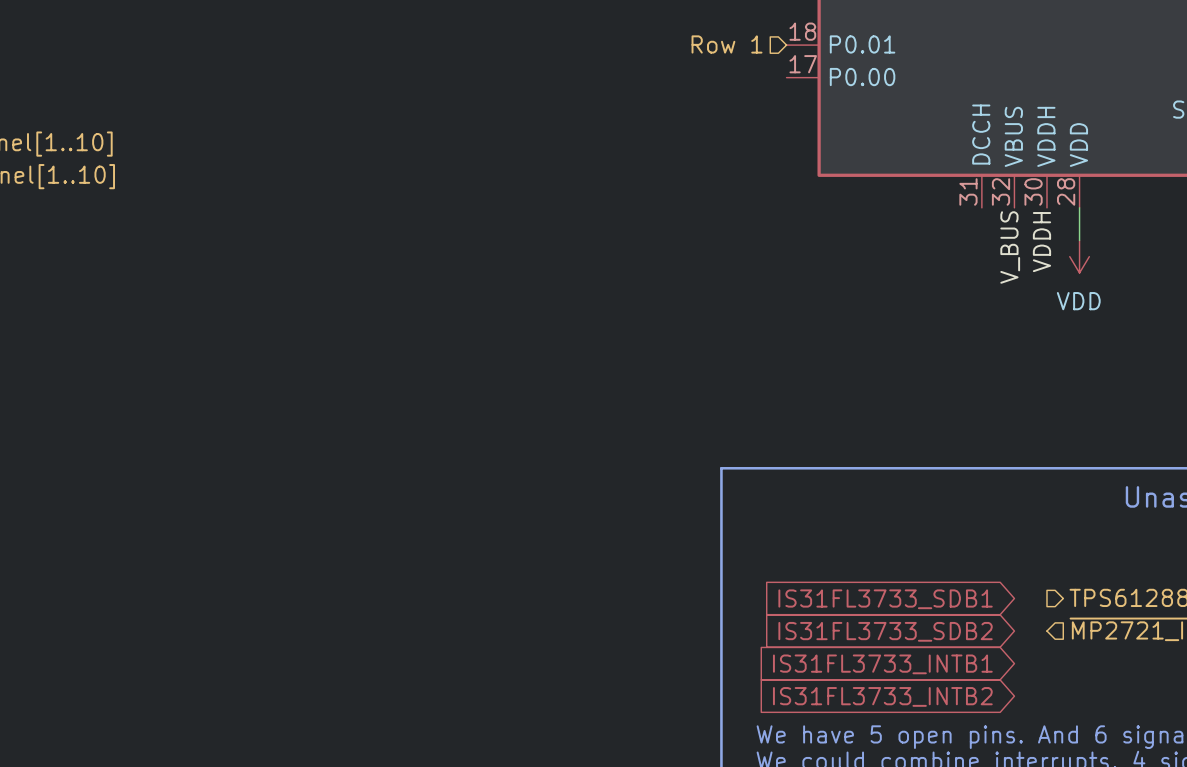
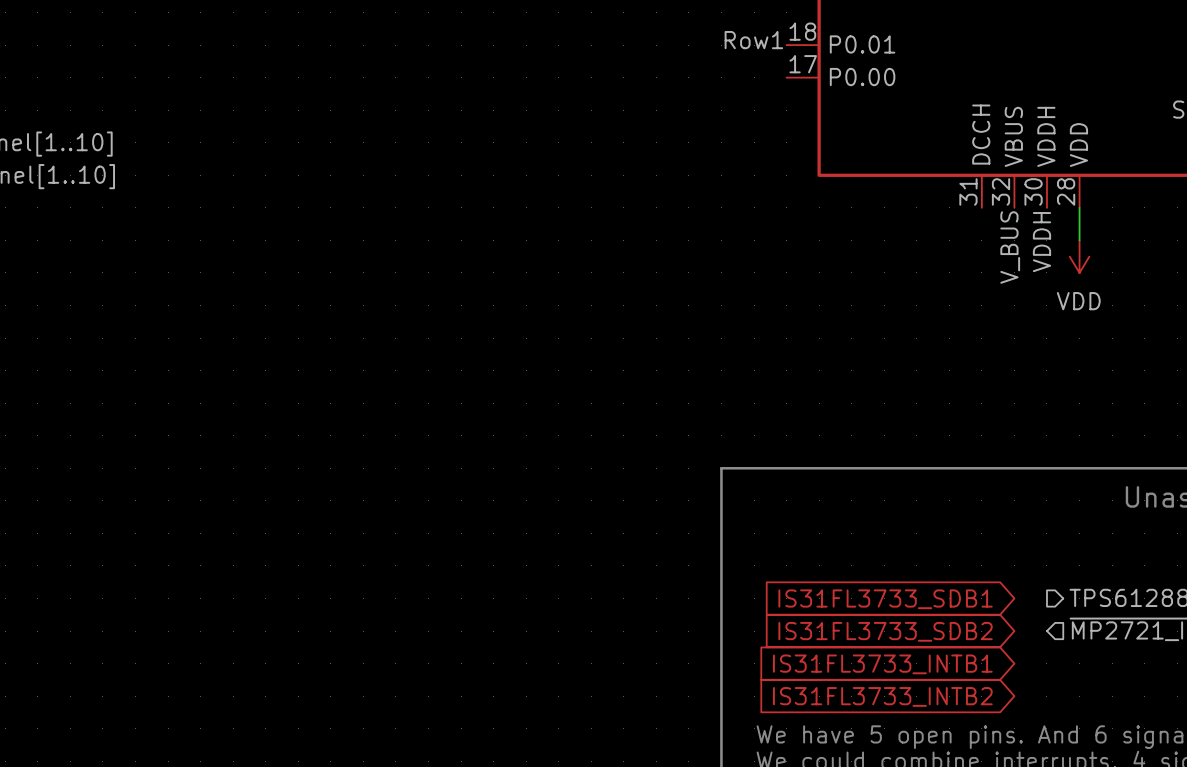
label: none -> Row1 (753, 40)
hierarchical label: Row 1 (727, 44) -> none

